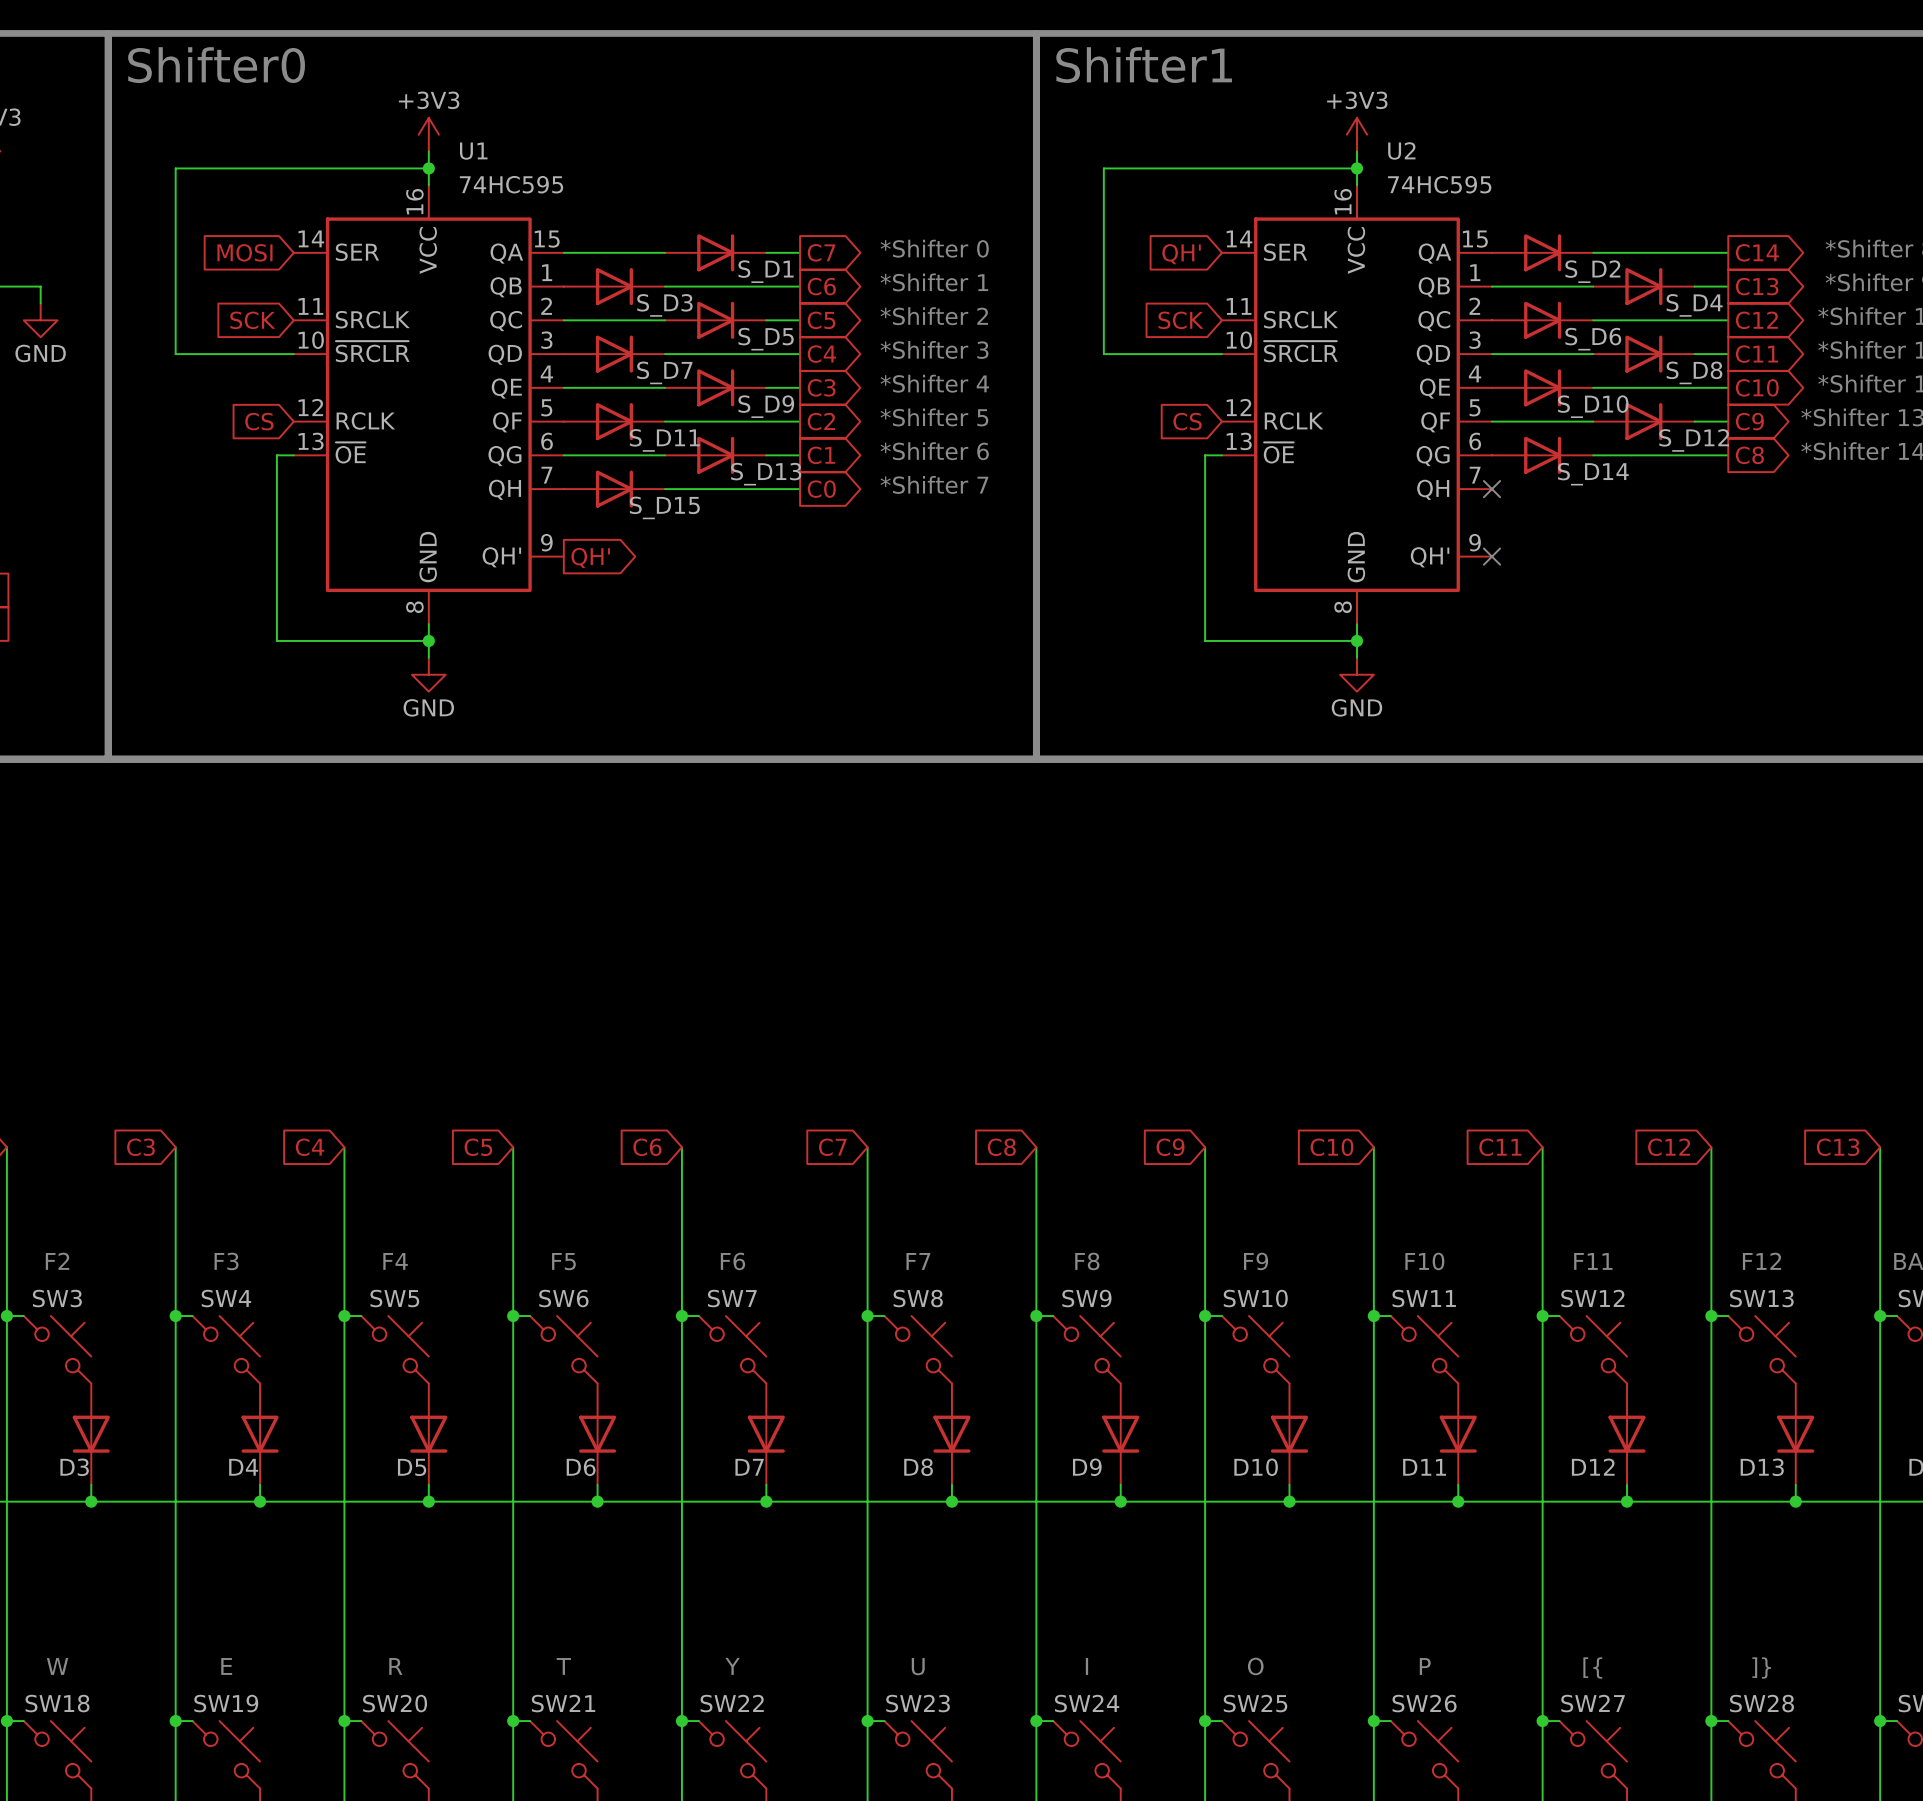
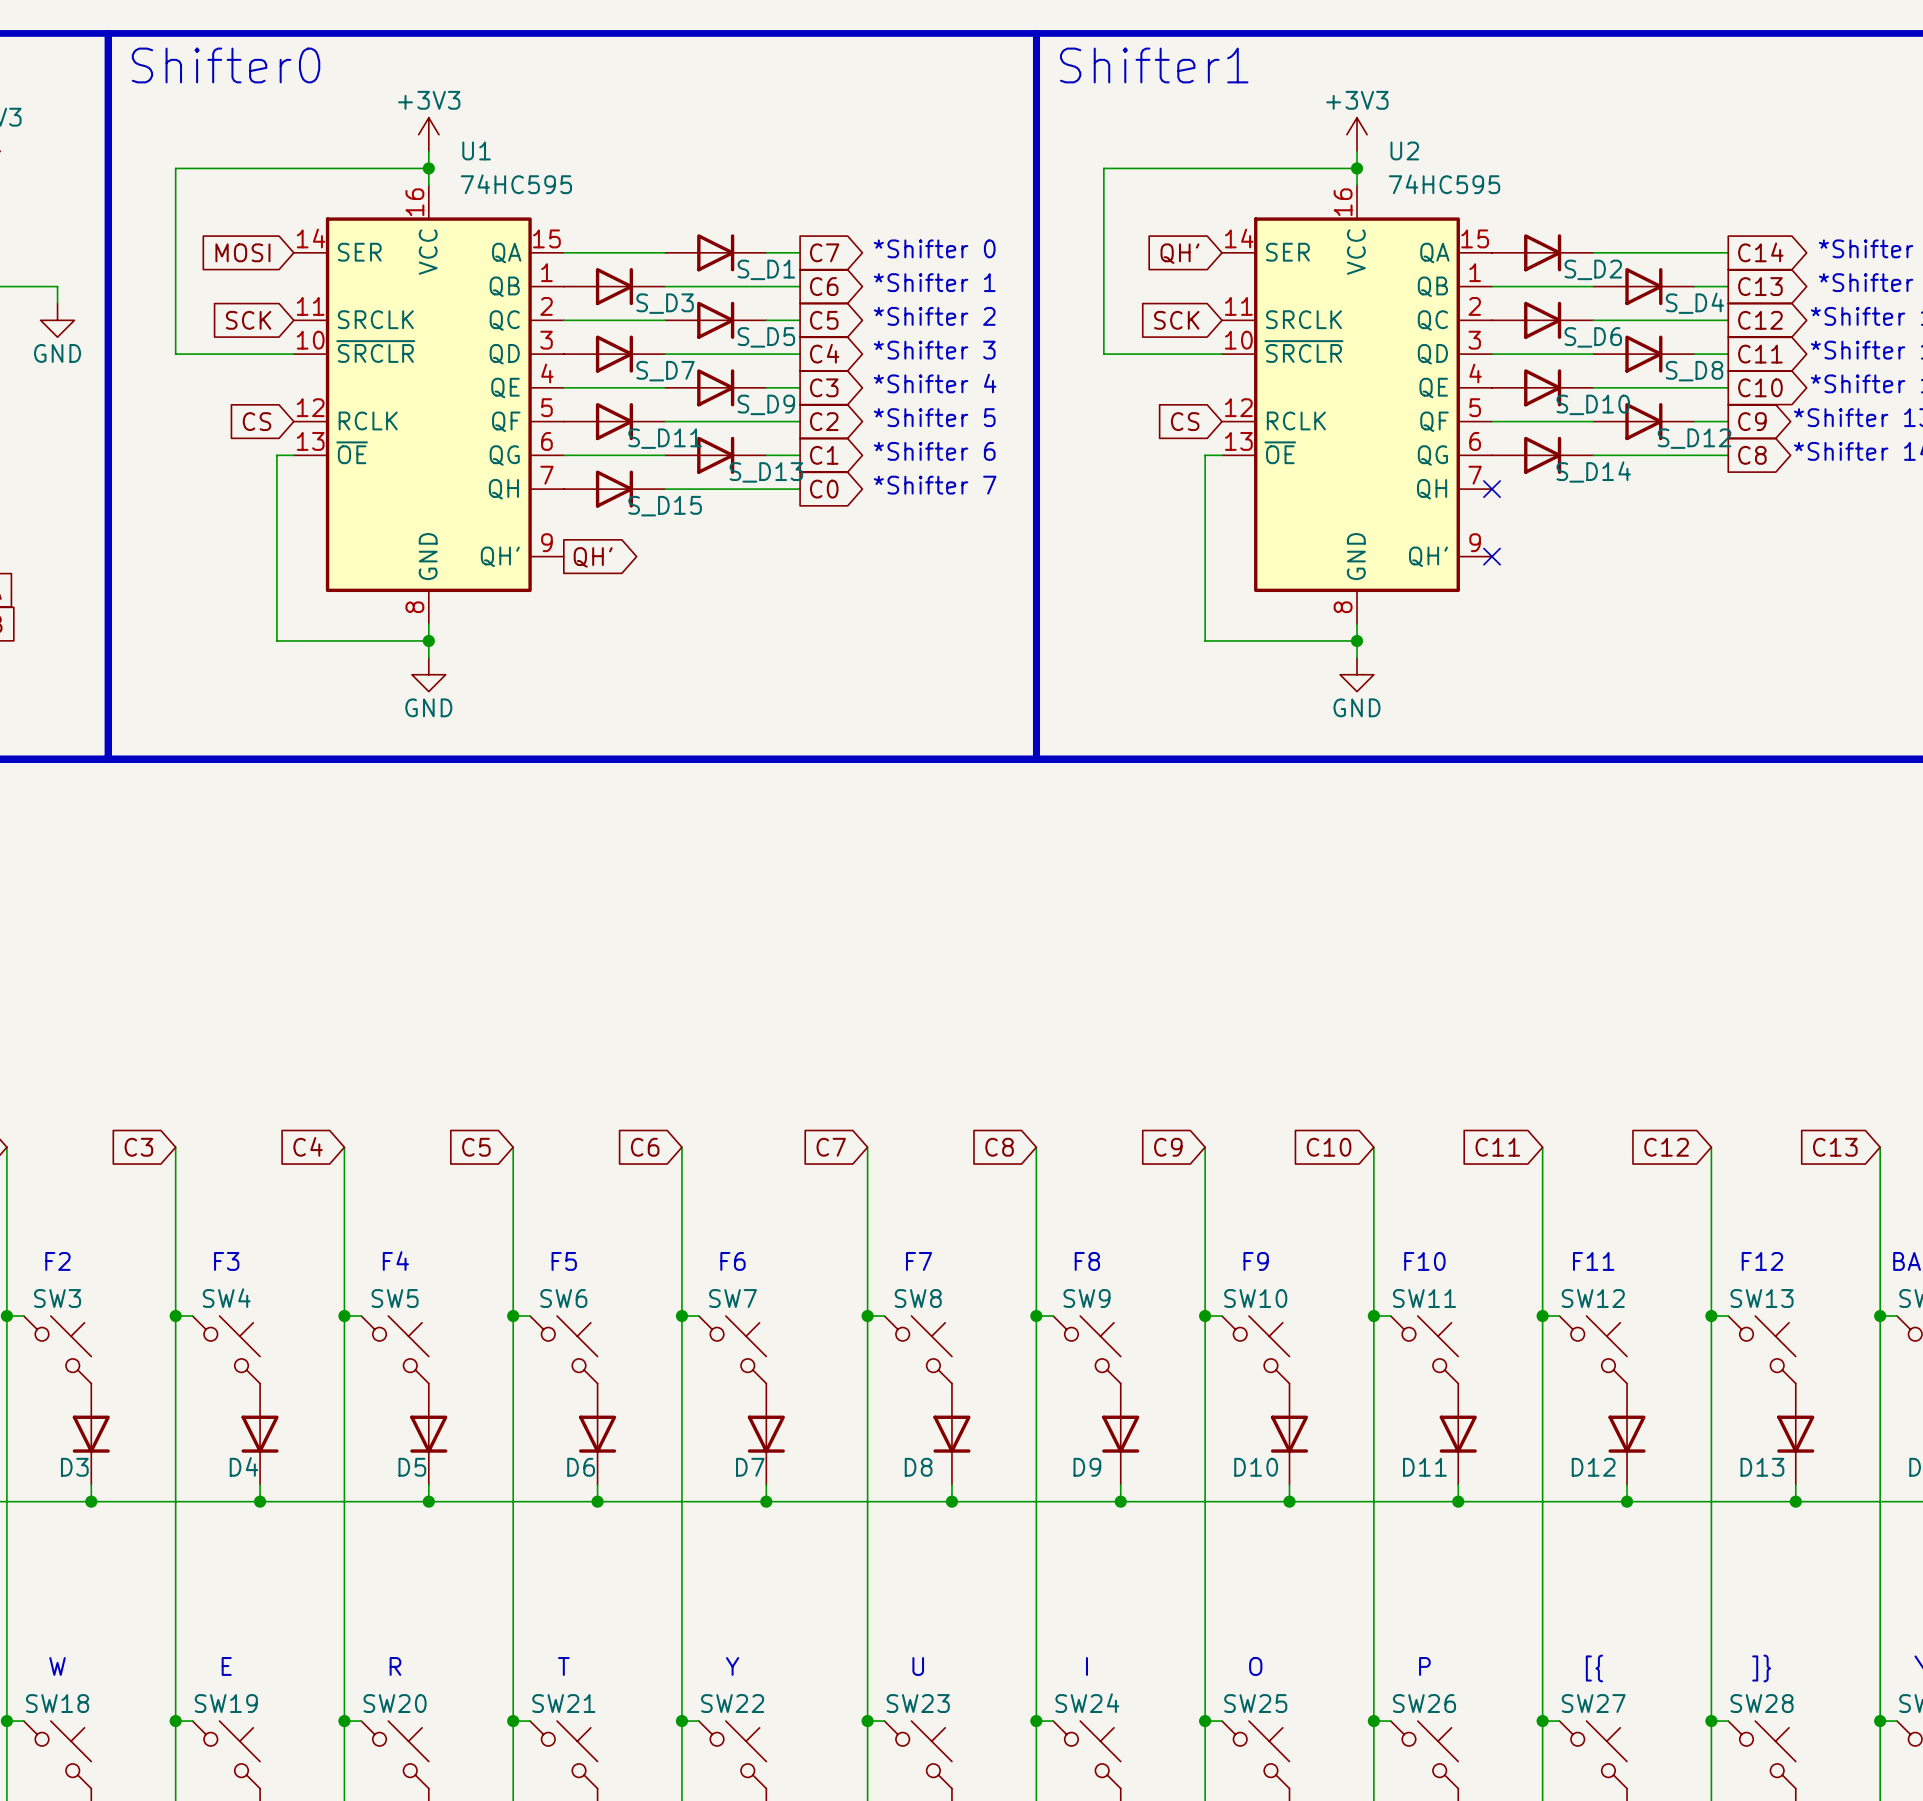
wire: (40, 286) (40, 303) -> (40, 286) (57, 286) (57, 303)
power symbol position: GND (40, 320) -> GND (57, 320)

